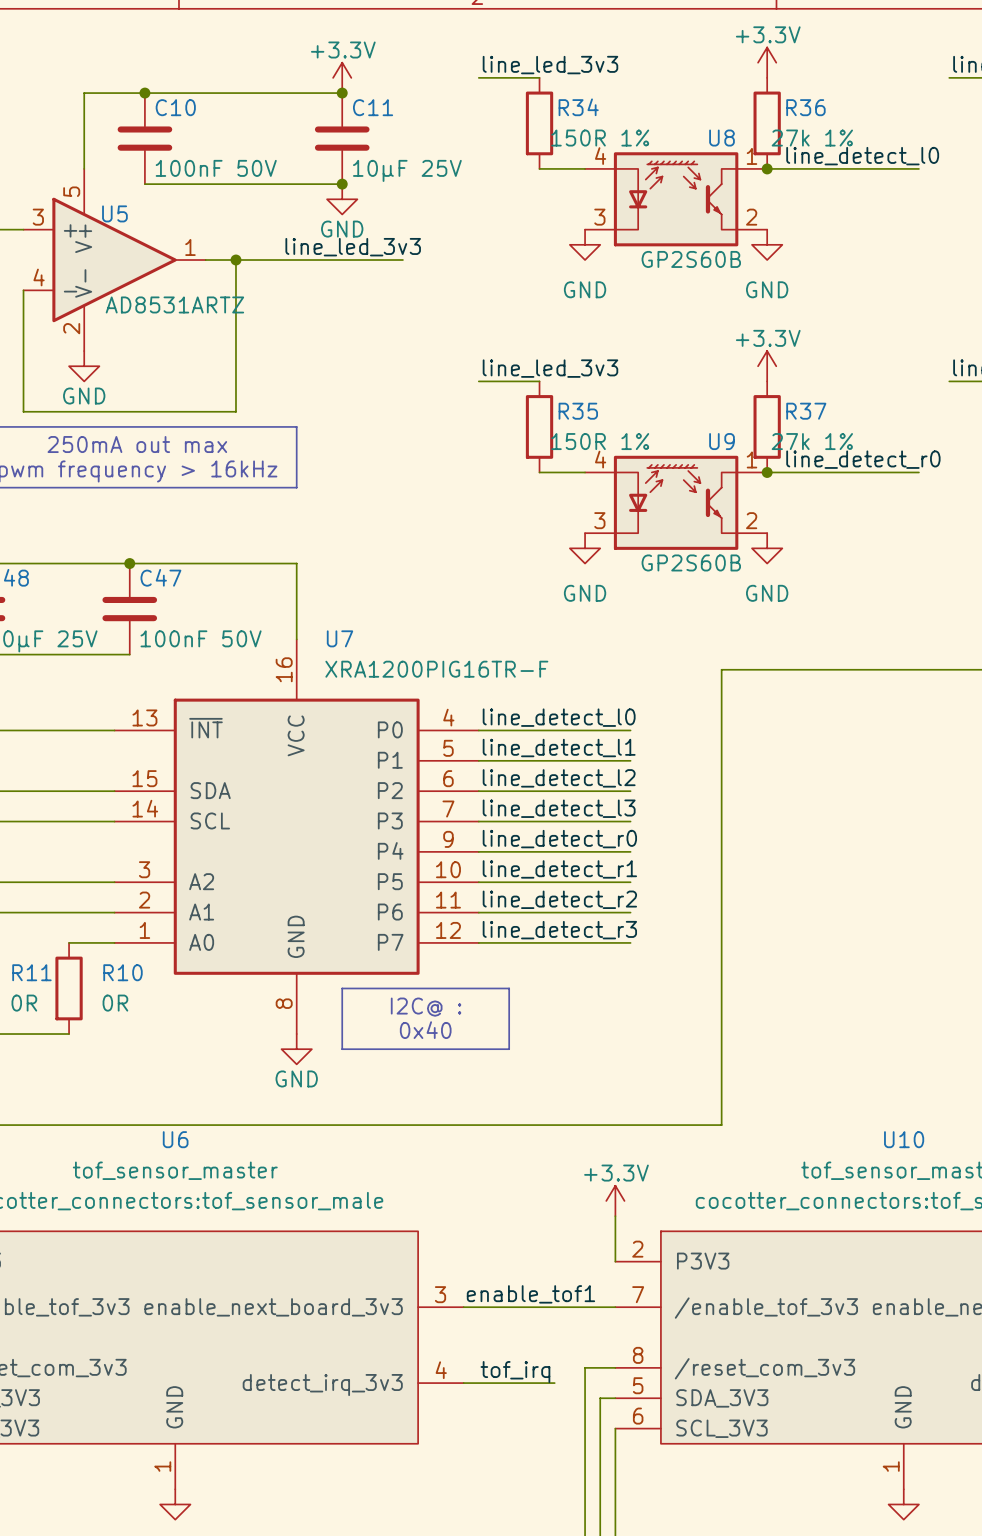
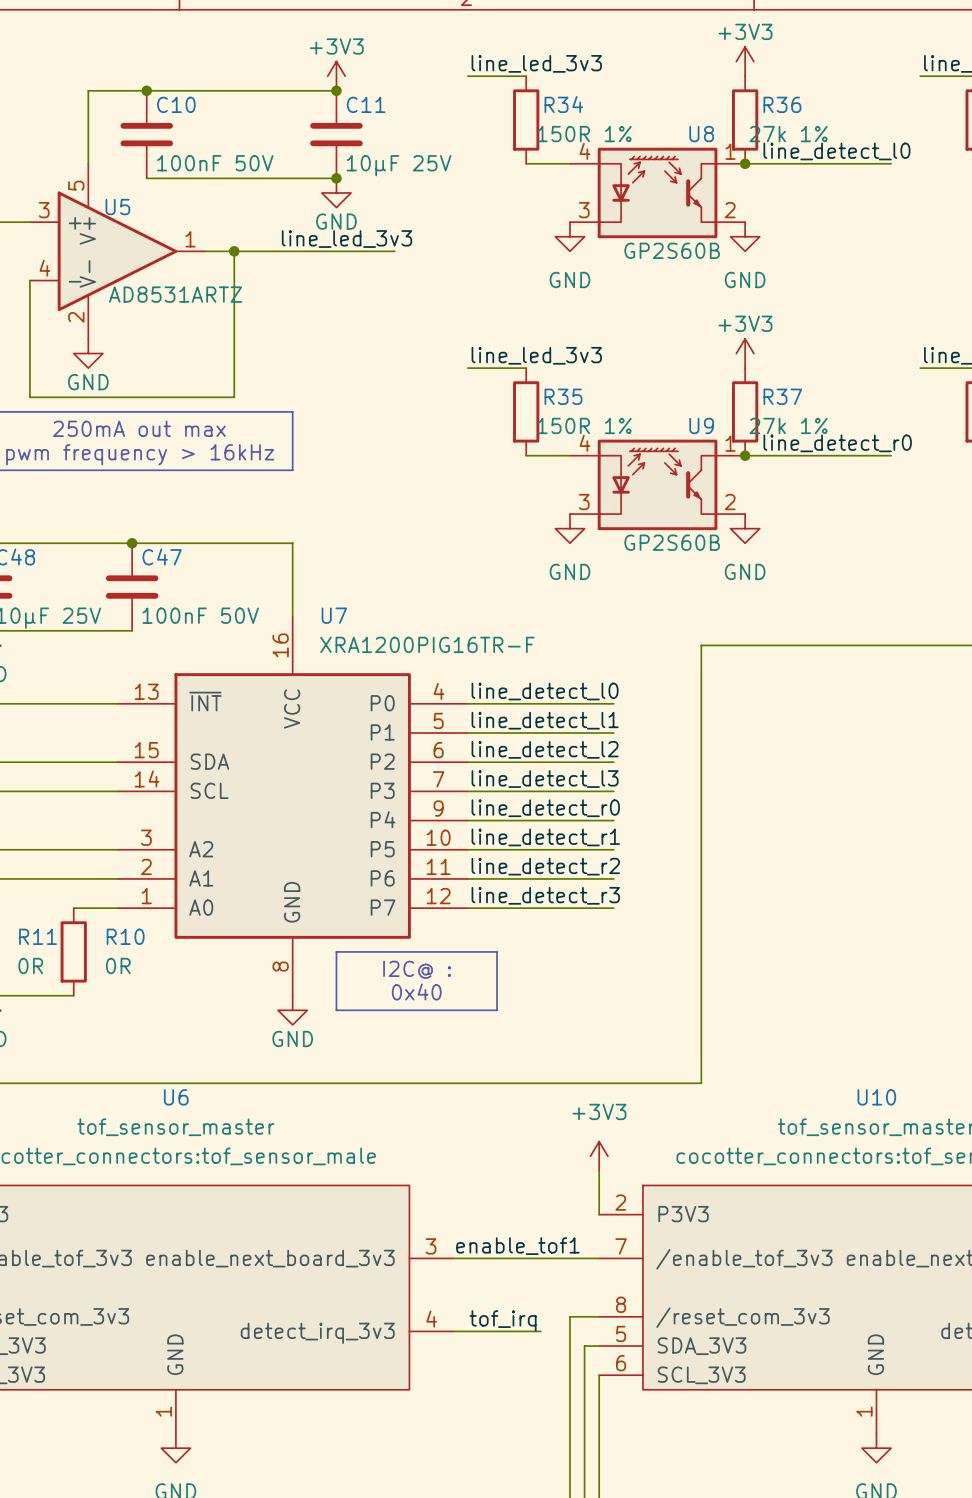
power symbol: +3.3V (767, 62) -> +3V3 (745, 61)
power symbol: +3.3V (342, 77) -> +3V3 (336, 76)
power symbol: +3.3V (767, 366) -> +3V3 (745, 353)
power symbol: +3.3V (615, 1200) -> +3V3 (599, 1156)

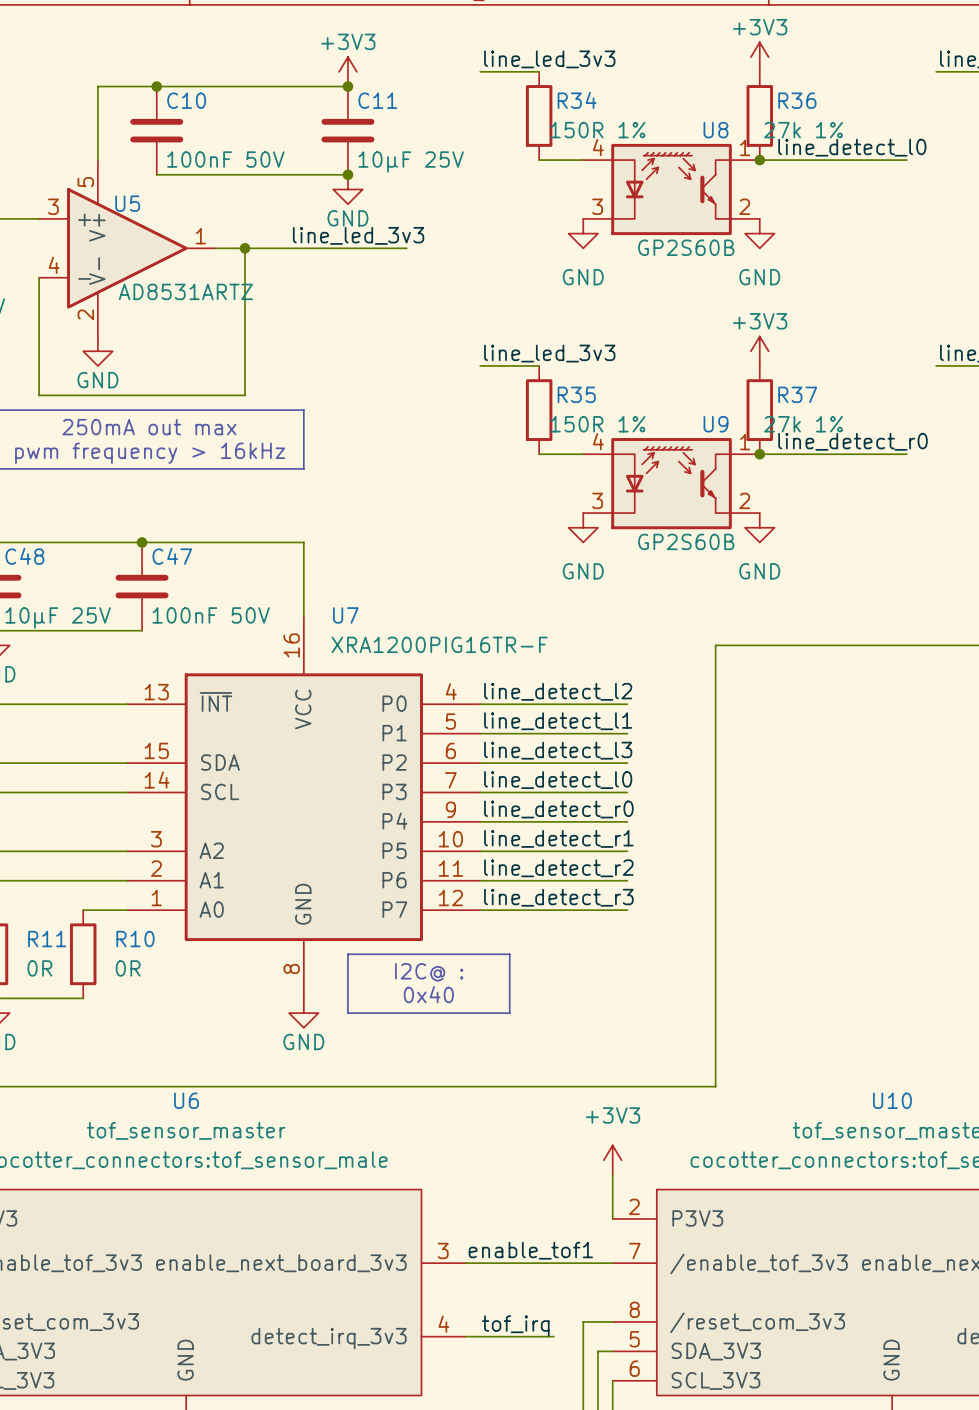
label: line_detect_l0 (545, 691) -> line_detect_l2 (558, 691)
label: line_detect_l2 (545, 749) -> line_detect_l3 (558, 750)
label: line_detect_l3 (545, 779) -> line_detect_l0 (558, 780)

